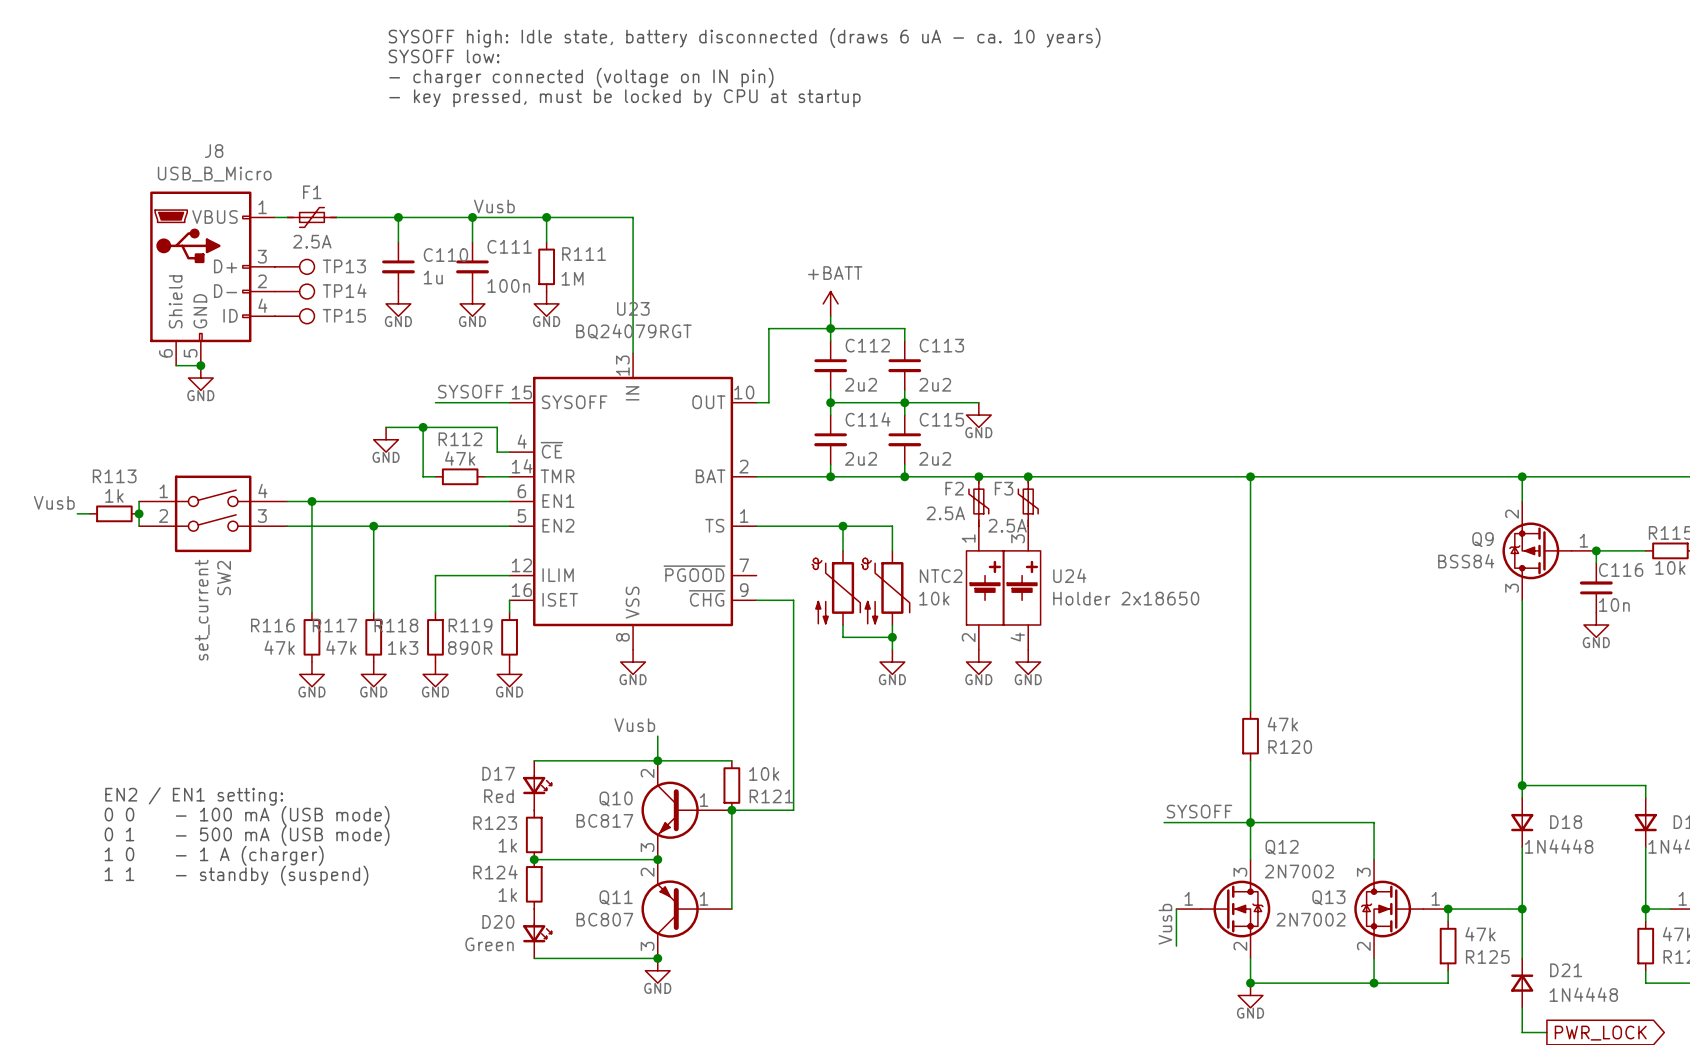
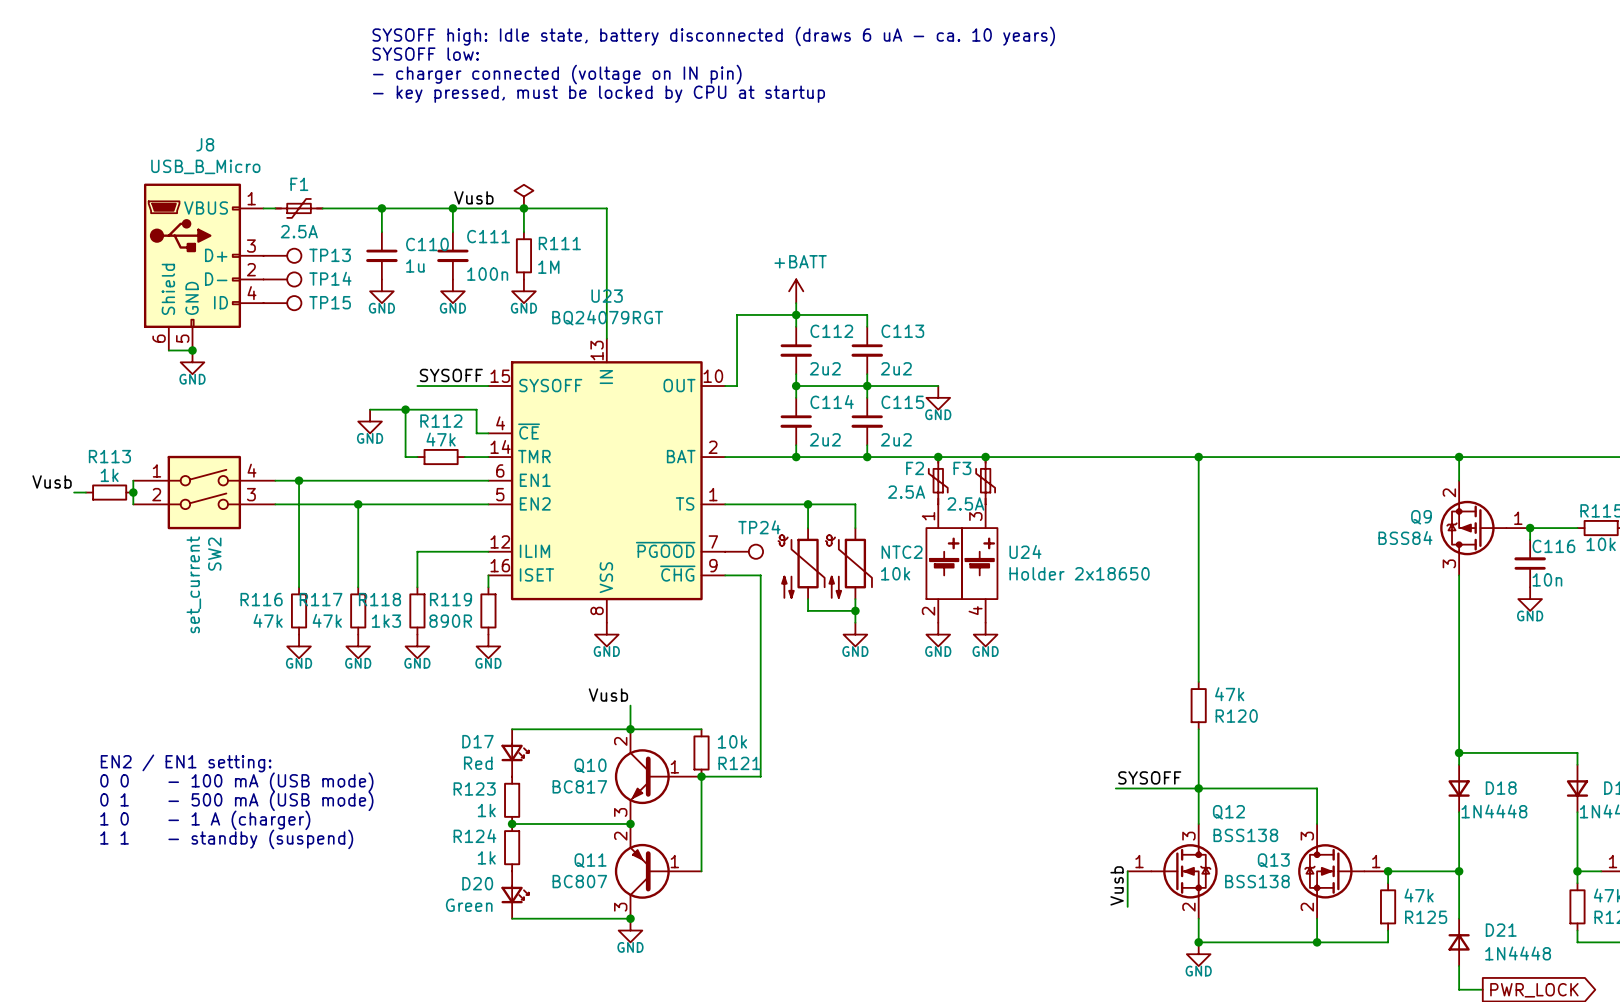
power symbol: none -> (523, 196)
TP24: none -> (744, 551)
Q12 value: 2N7002 (1299, 871) -> BSS138 (1245, 835)
Q13 value: 2N7002 (1310, 919) -> BSS138 (1257, 881)

